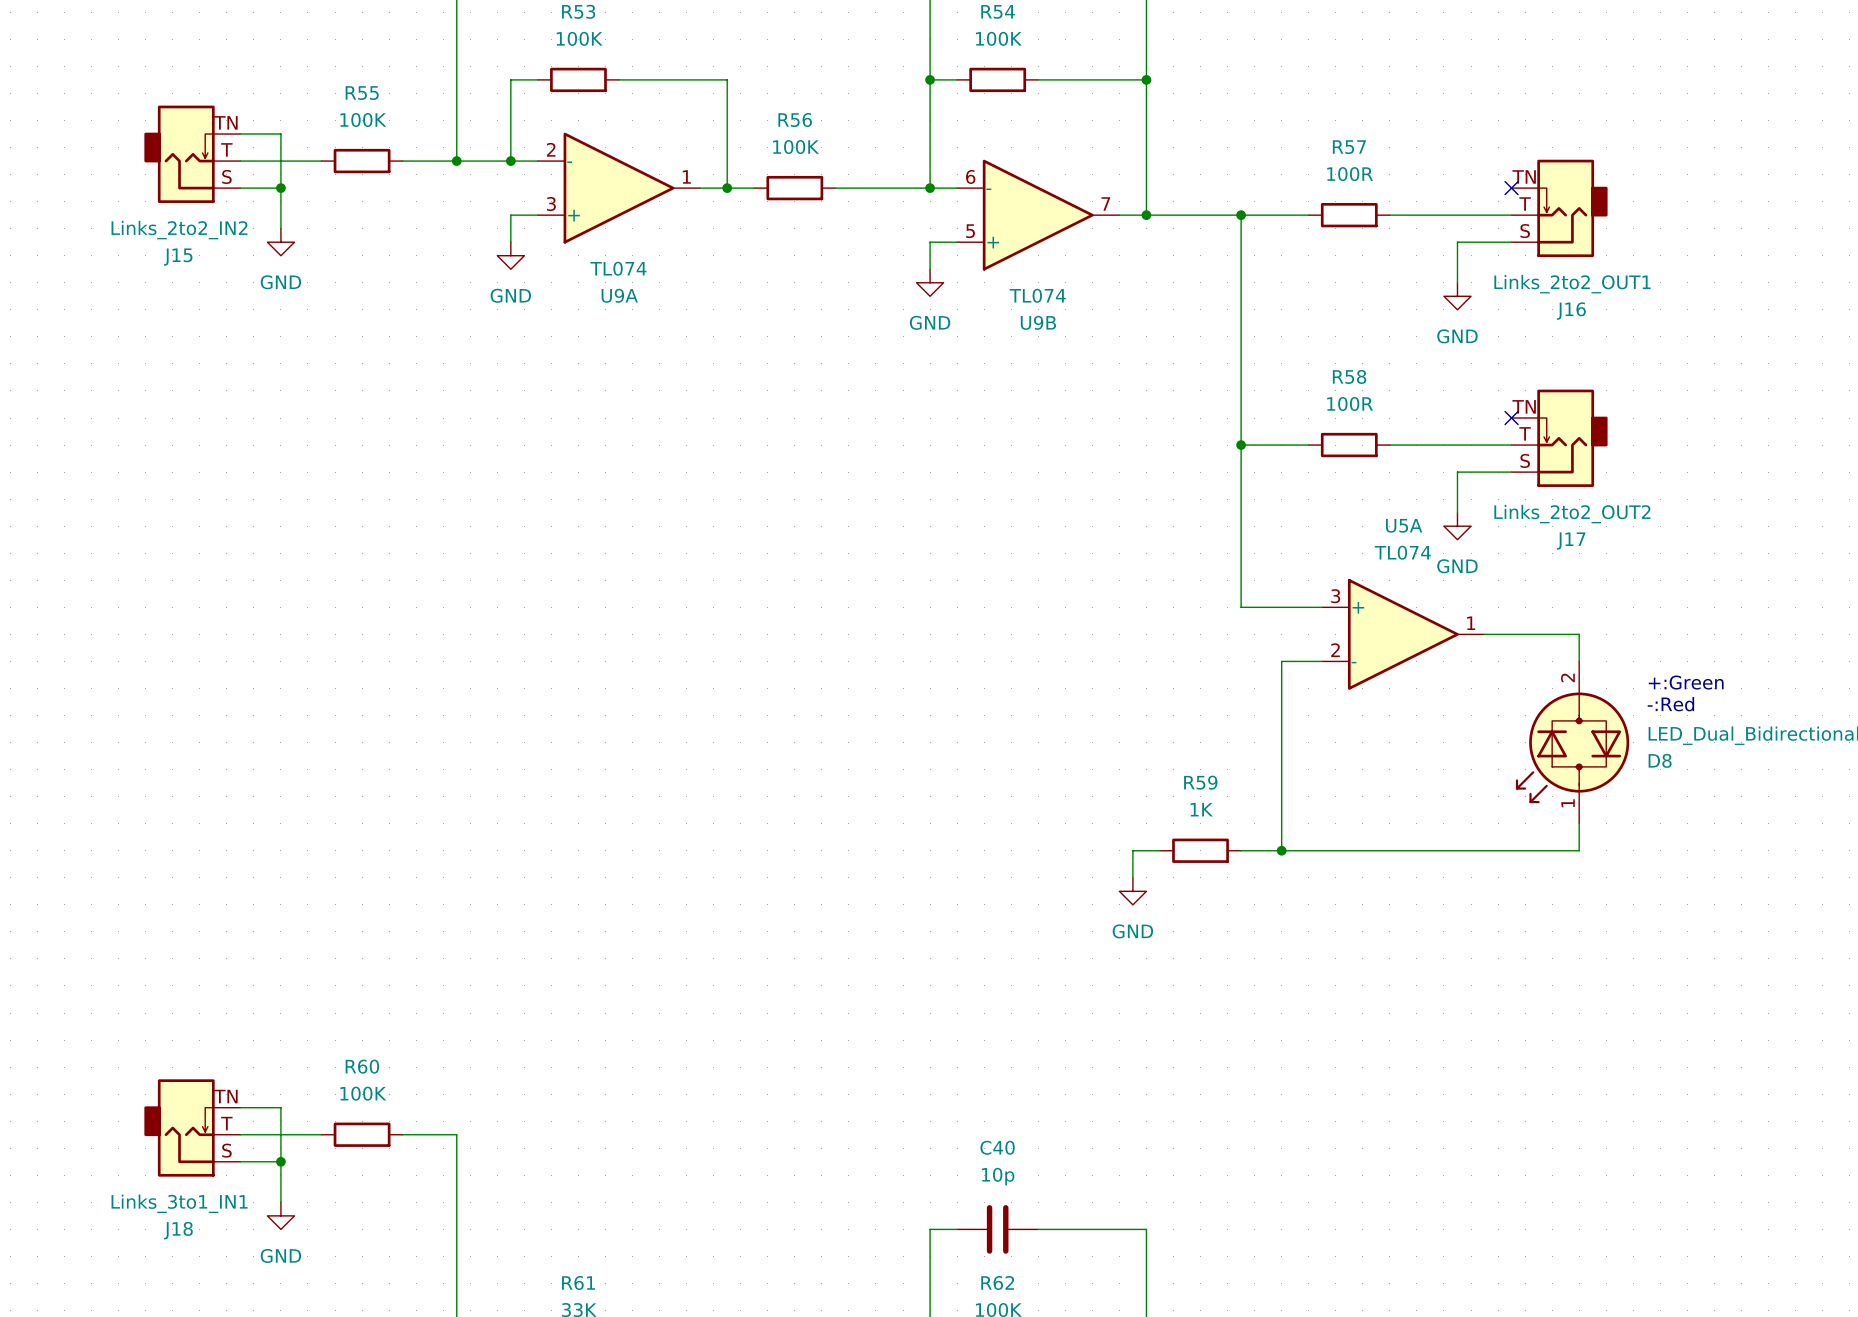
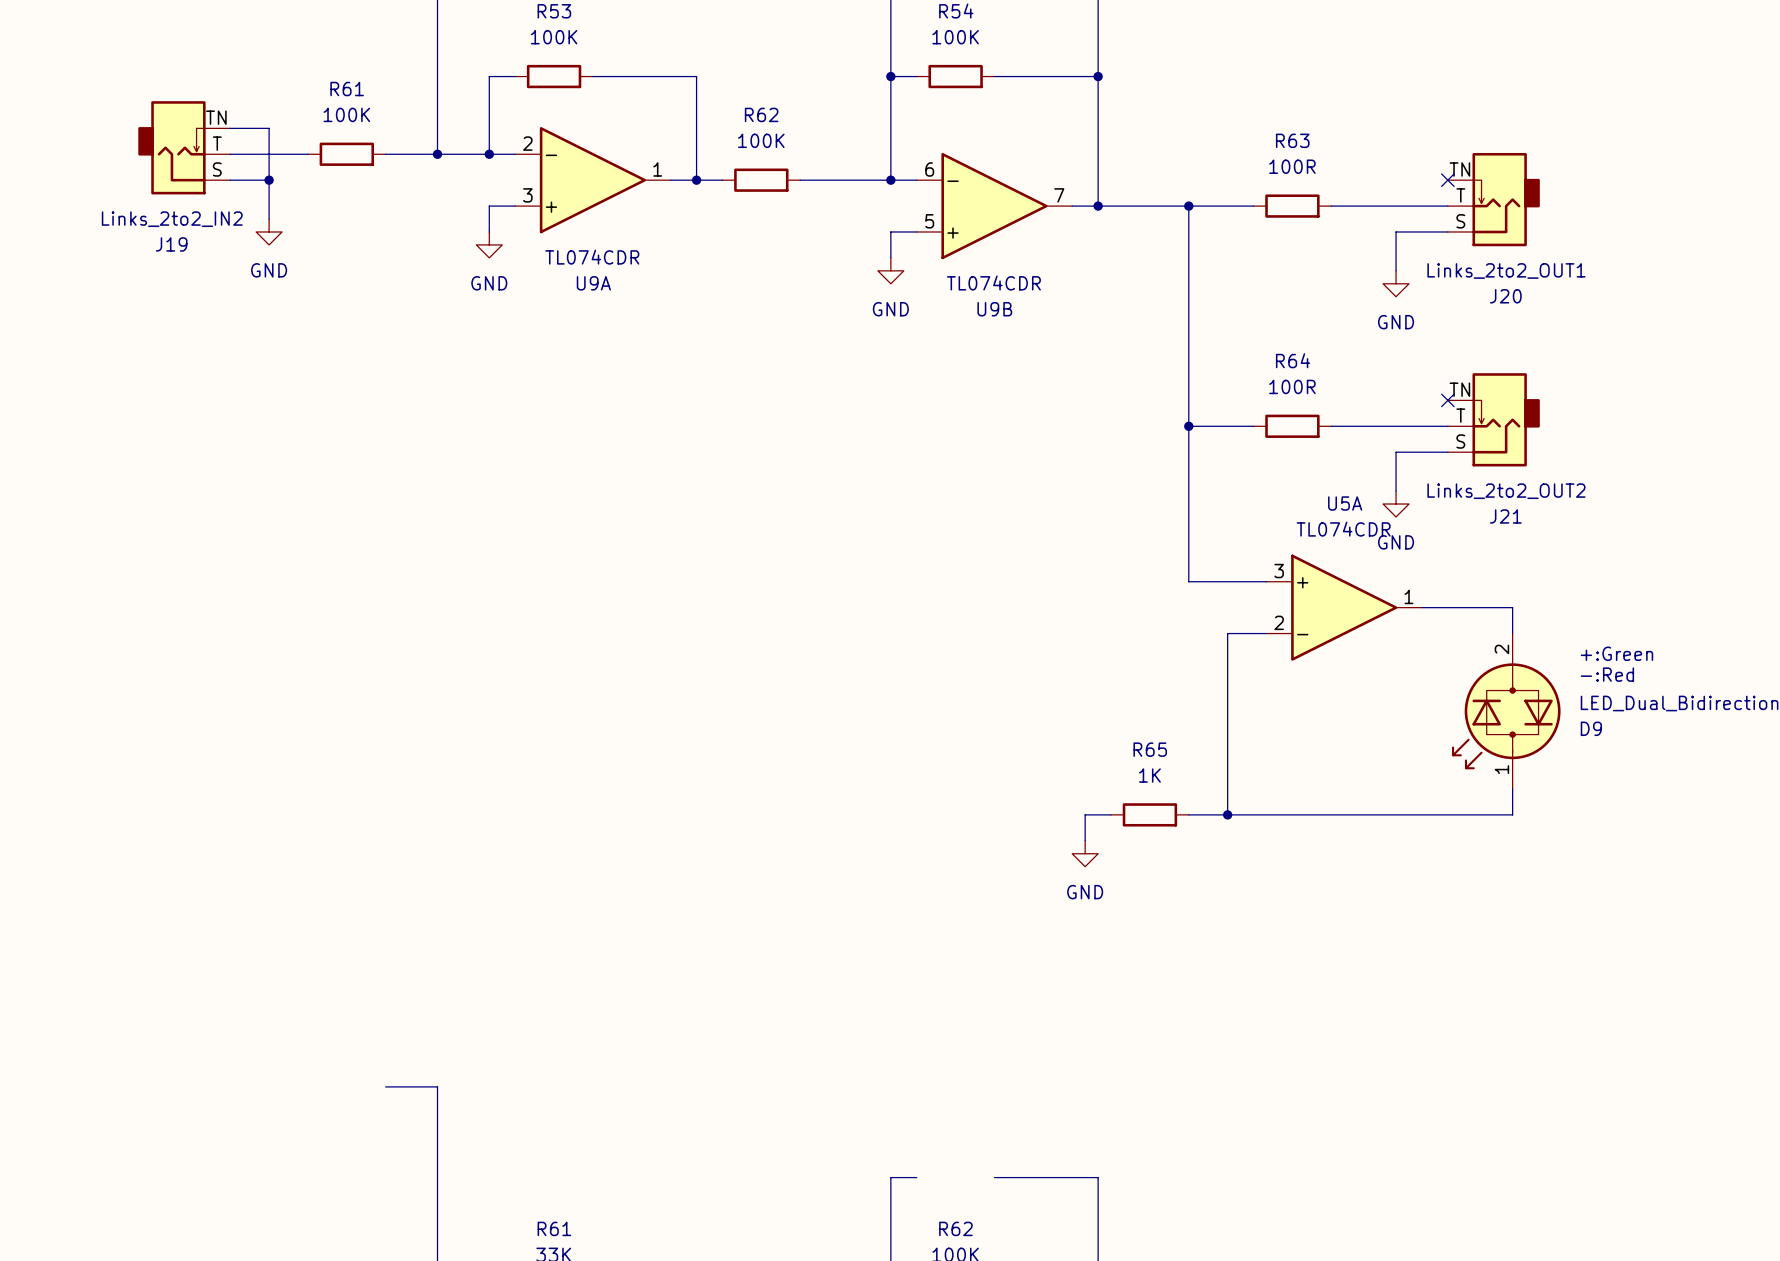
R55 name: R55 (362, 93) -> R61 (347, 89)
R56 name: R56 (795, 119) -> R62 (761, 114)
R57 name: R57 (1349, 147) -> R63 (1292, 140)
J15 name: J15 (178, 257) -> J19 (171, 244)
U9A value: TL074 (618, 268) -> TL074CDR (592, 257)
U9B value: TL074 (1037, 295) -> TL074CDR (993, 283)
J16 name: J16 (1571, 311) -> J20 (1505, 296)
R58 name: R58 (1349, 376) -> R64 (1293, 360)
J17 name: J17 (1571, 541) -> J21 (1505, 516)
U5A value: TL074 (1402, 552) -> TL074CDR (1343, 529)
D8 name: D8 (1660, 760) -> D9 (1591, 728)
R59 name: R59 (1200, 782) -> R65 (1150, 749)
wire: (240, 1107) (280, 1107) (280, 1202) -> none
J18: Links_3to1_IN1 (192, 1127) -> none
wire: (240, 1134) (321, 1134) -> none
R60: 100K (362, 1134) -> none
wire: (240, 1161) (280, 1161) -> none
junction: (280, 1161) -> none
power symbol: GND (280, 1215) -> none
C40: 10p (997, 1229) -> none

